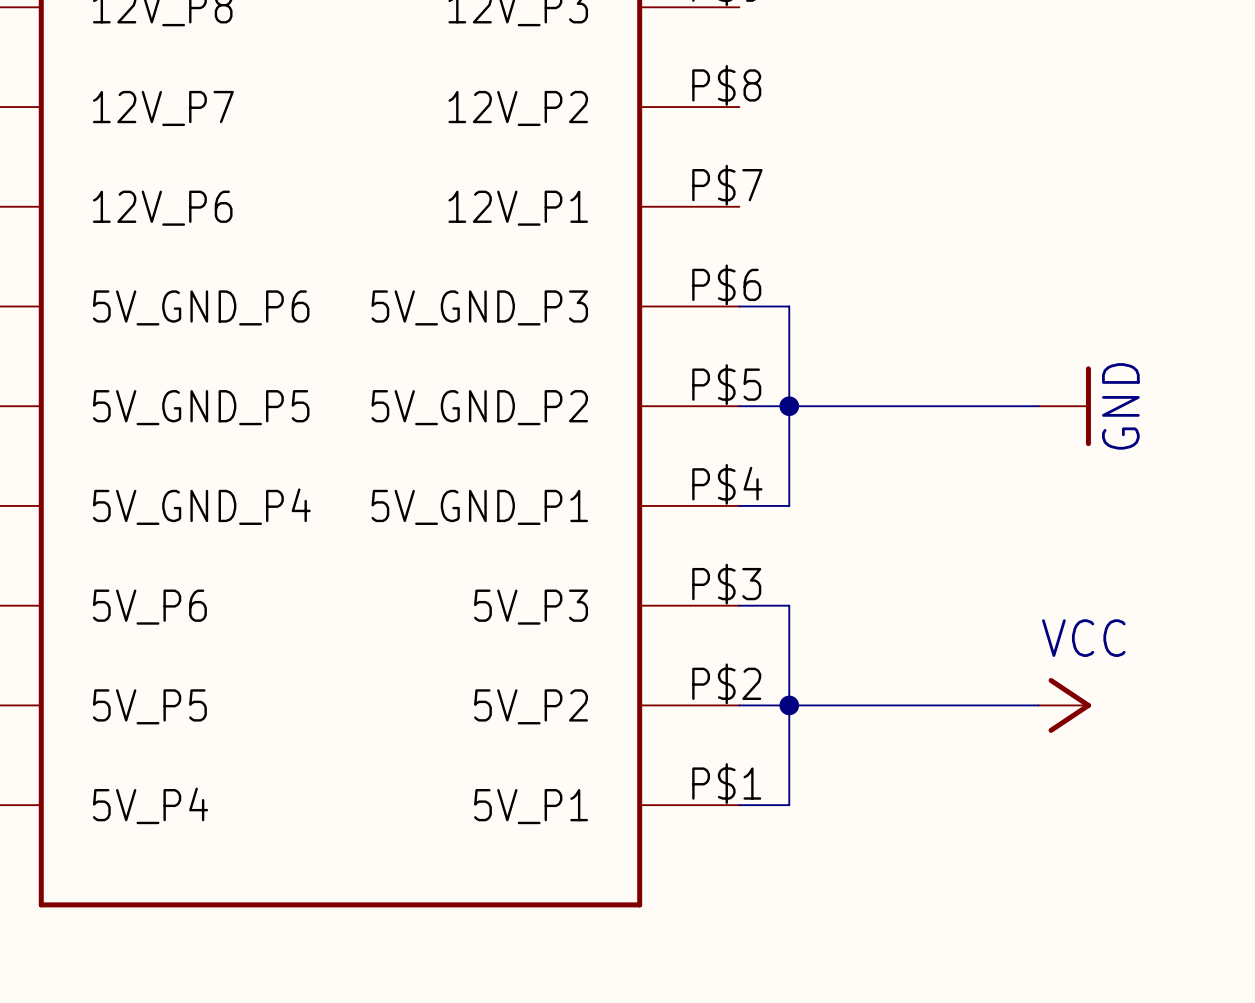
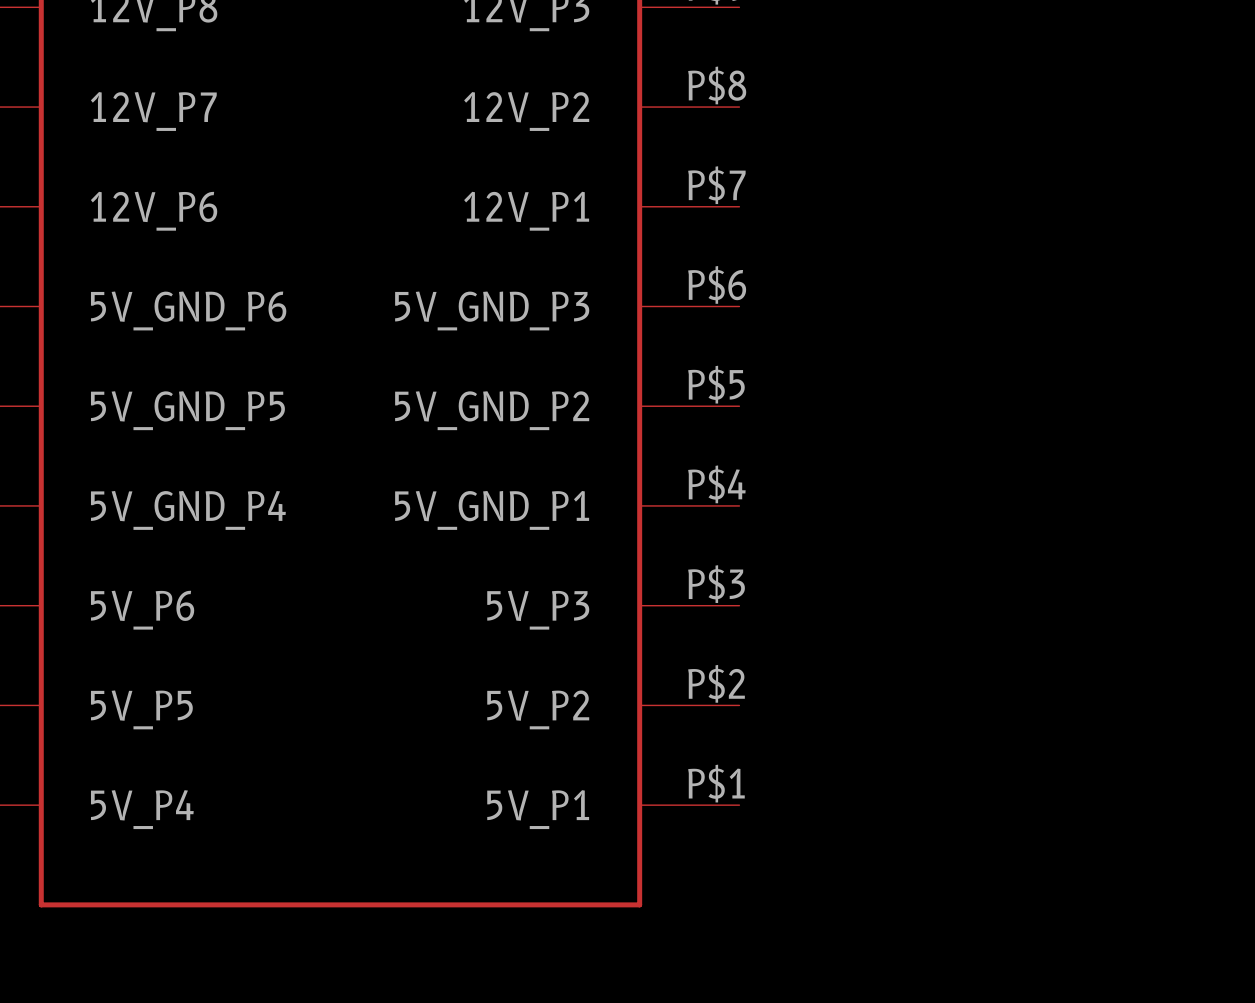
wire: (739, 306) (789, 306) (789, 505) (739, 505) -> none
wire: (739, 406) (1038, 406) -> none
junction: (789, 406) -> none
power symbol: GND (1064, 406) -> none
wire: (739, 605) (789, 605) (789, 805) (739, 805) -> none
wire: (739, 705) (1038, 705) -> none
junction: (789, 705) -> none
power symbol: VCC (1064, 705) -> none

